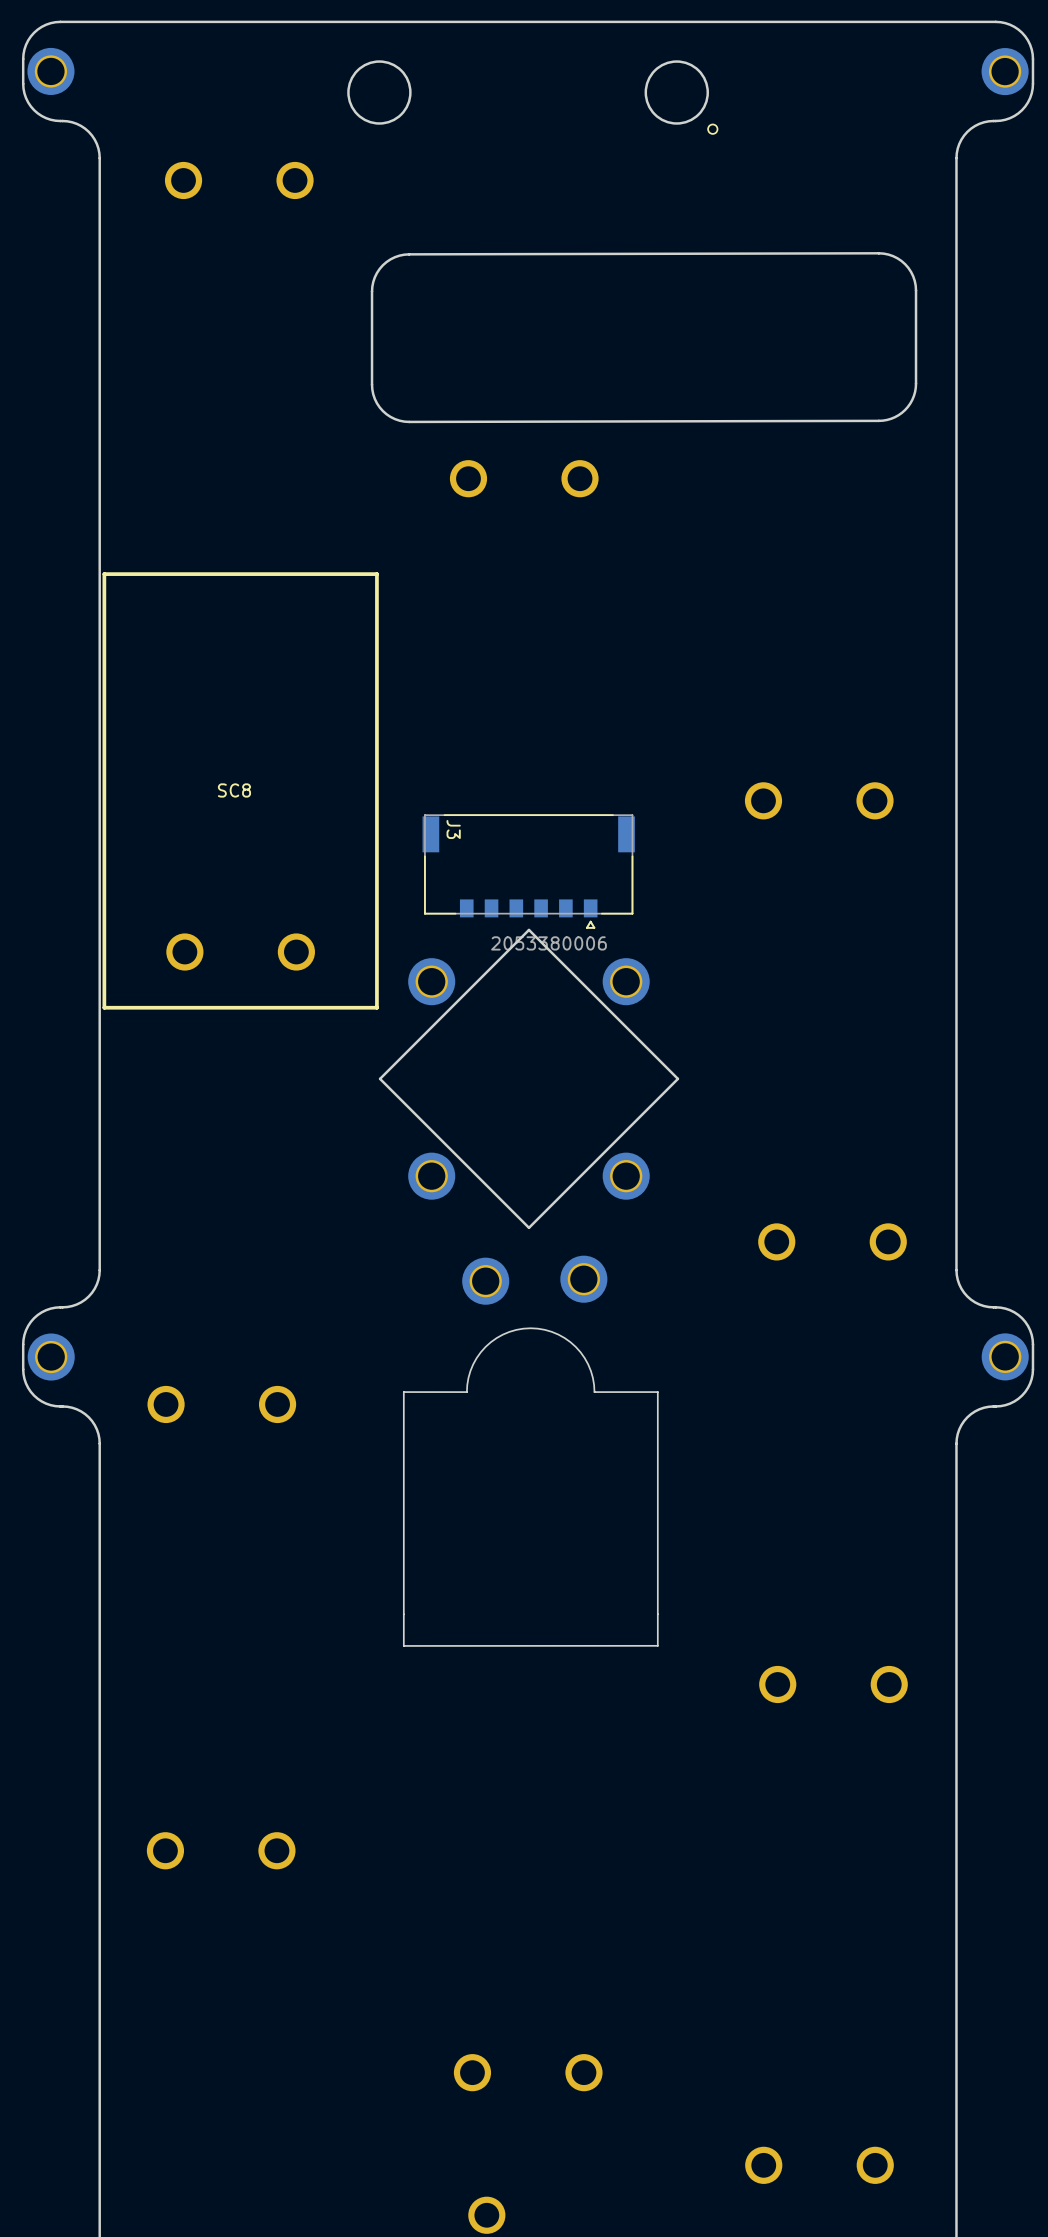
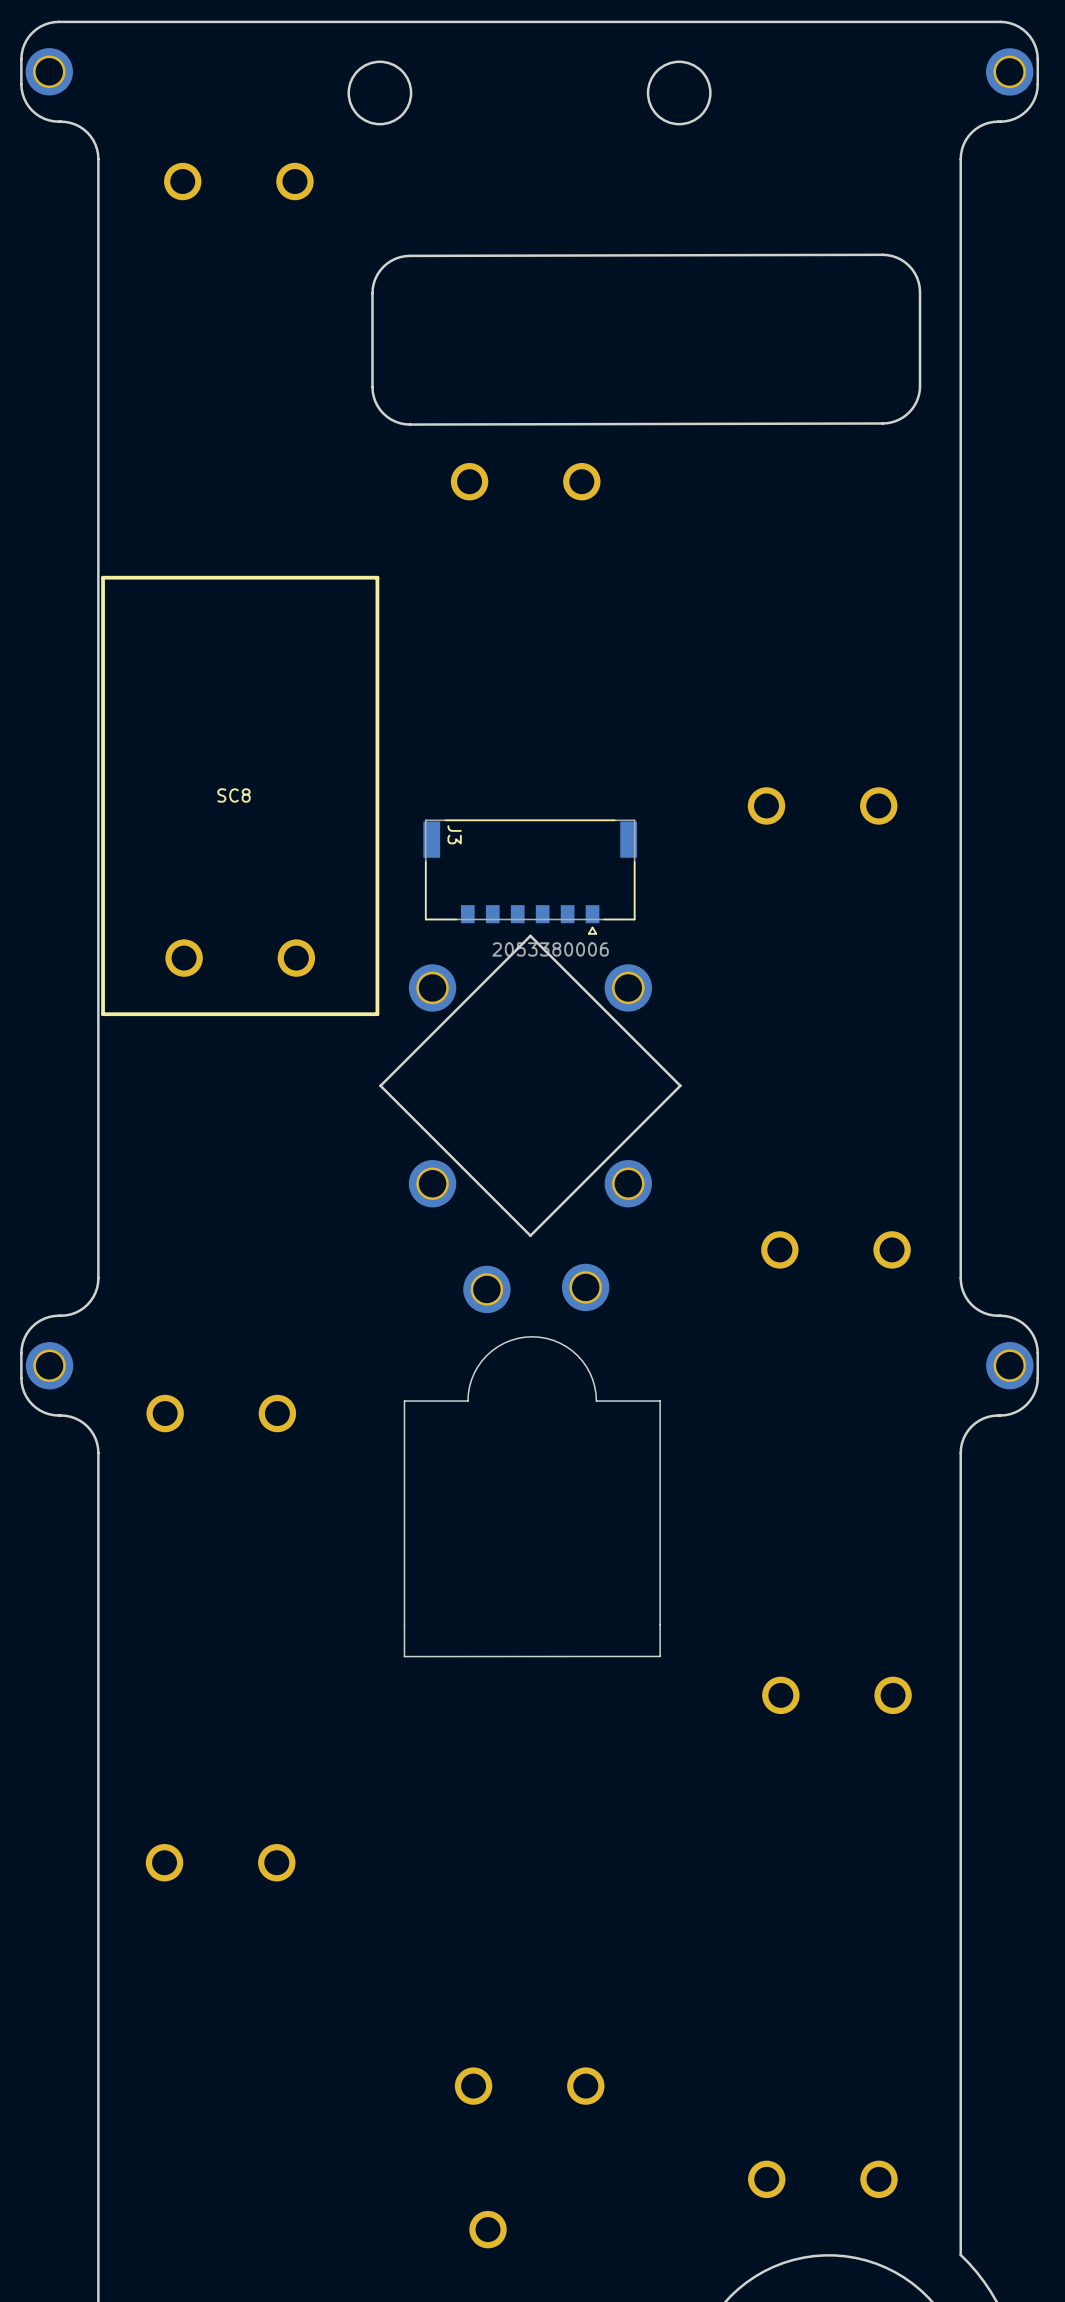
part: (712, 129) -> none

